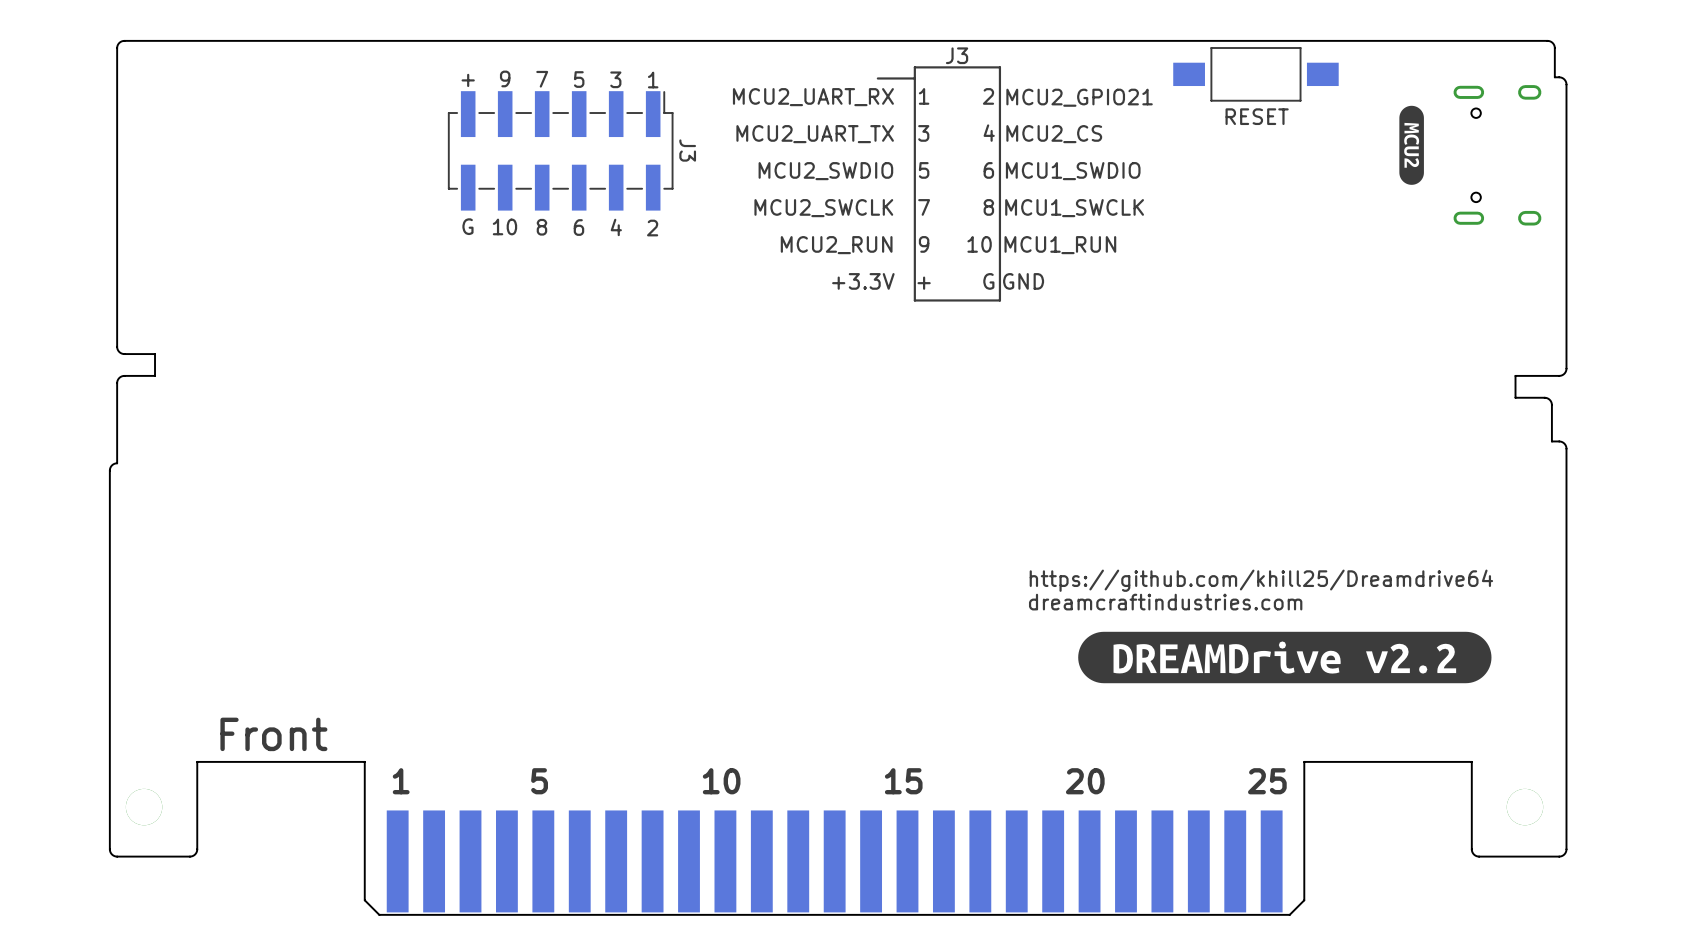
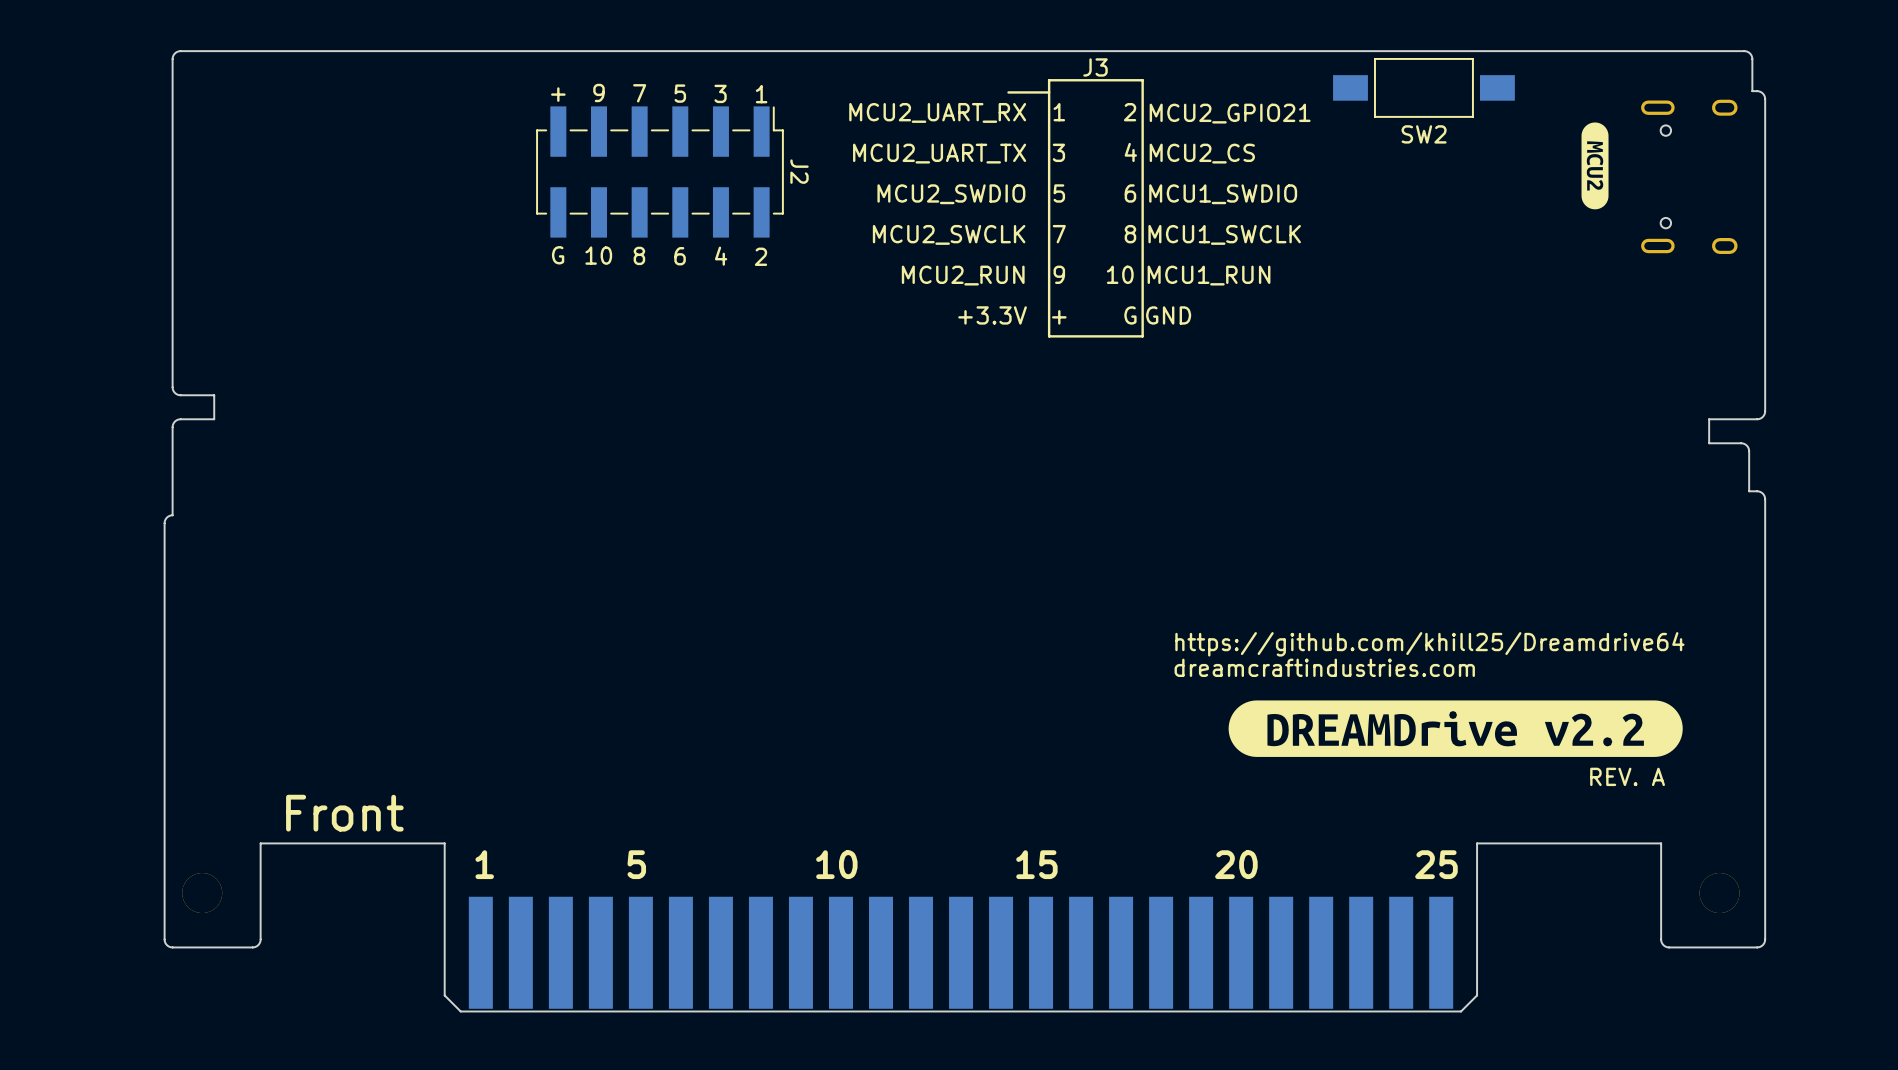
RESET name: RESET (1257, 116) -> SW2 (1424, 134)
J3 name: J3 (687, 150) -> J2 (799, 171)
text: none -> REV. A (1627, 776)

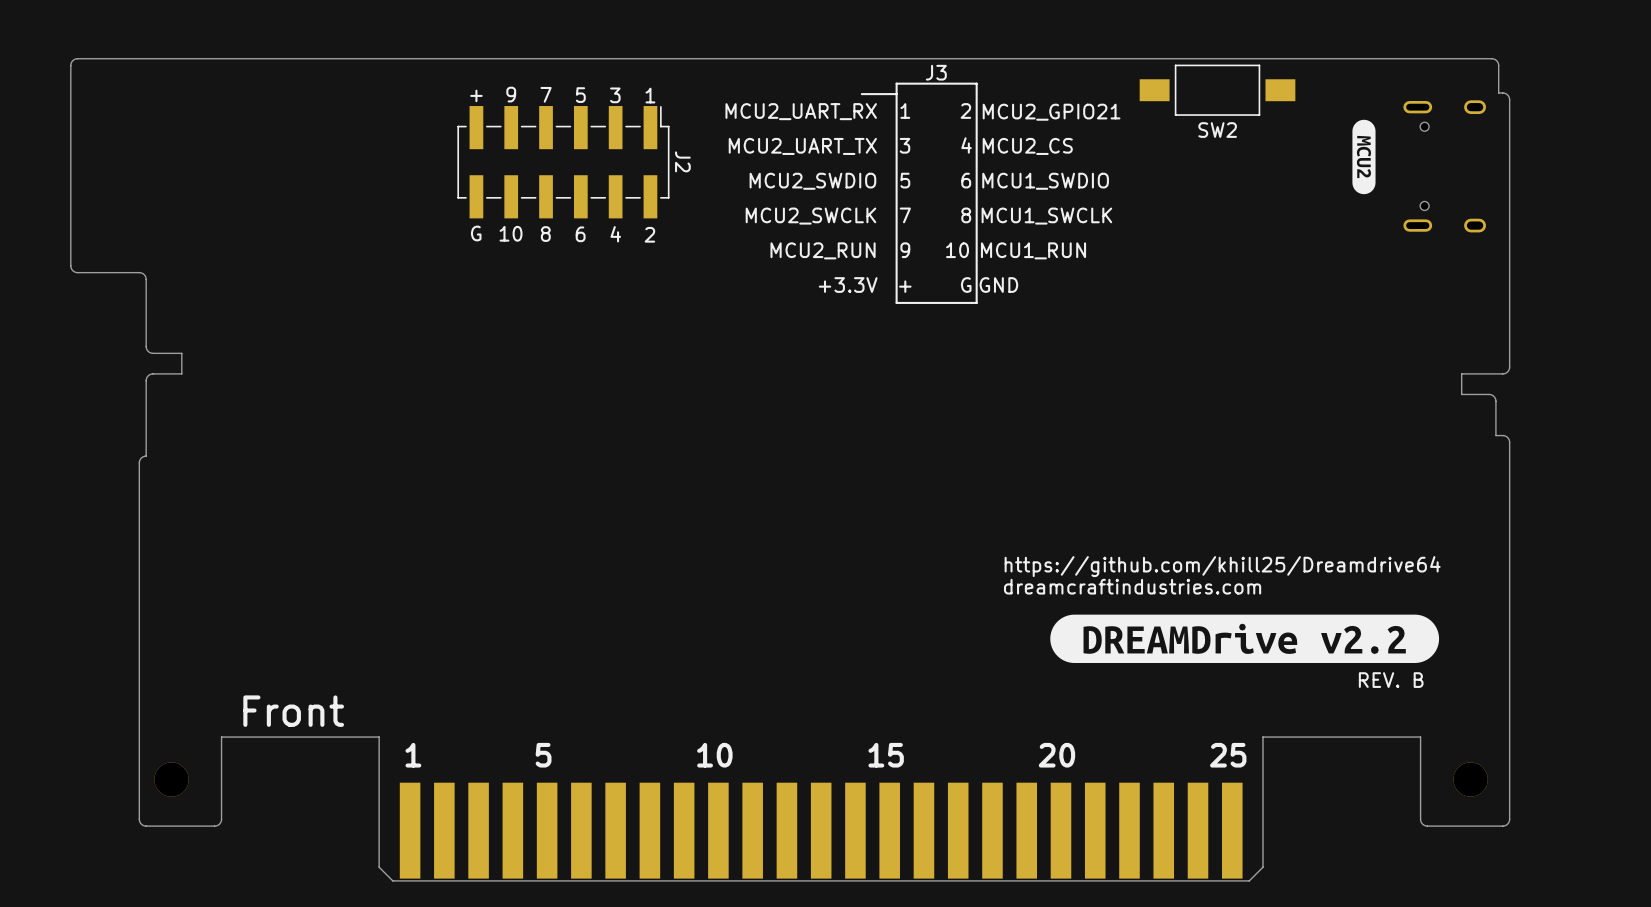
board edge: (180, 51) (174, 53) (172, 59) (172, 308) -> (153, 58) (76, 58) (72, 61) (70, 65) (71, 268) (77, 272) (140, 272) (144, 274) (146, 279)
text: REV. A (1627, 776) -> REV. B (1391, 680)

